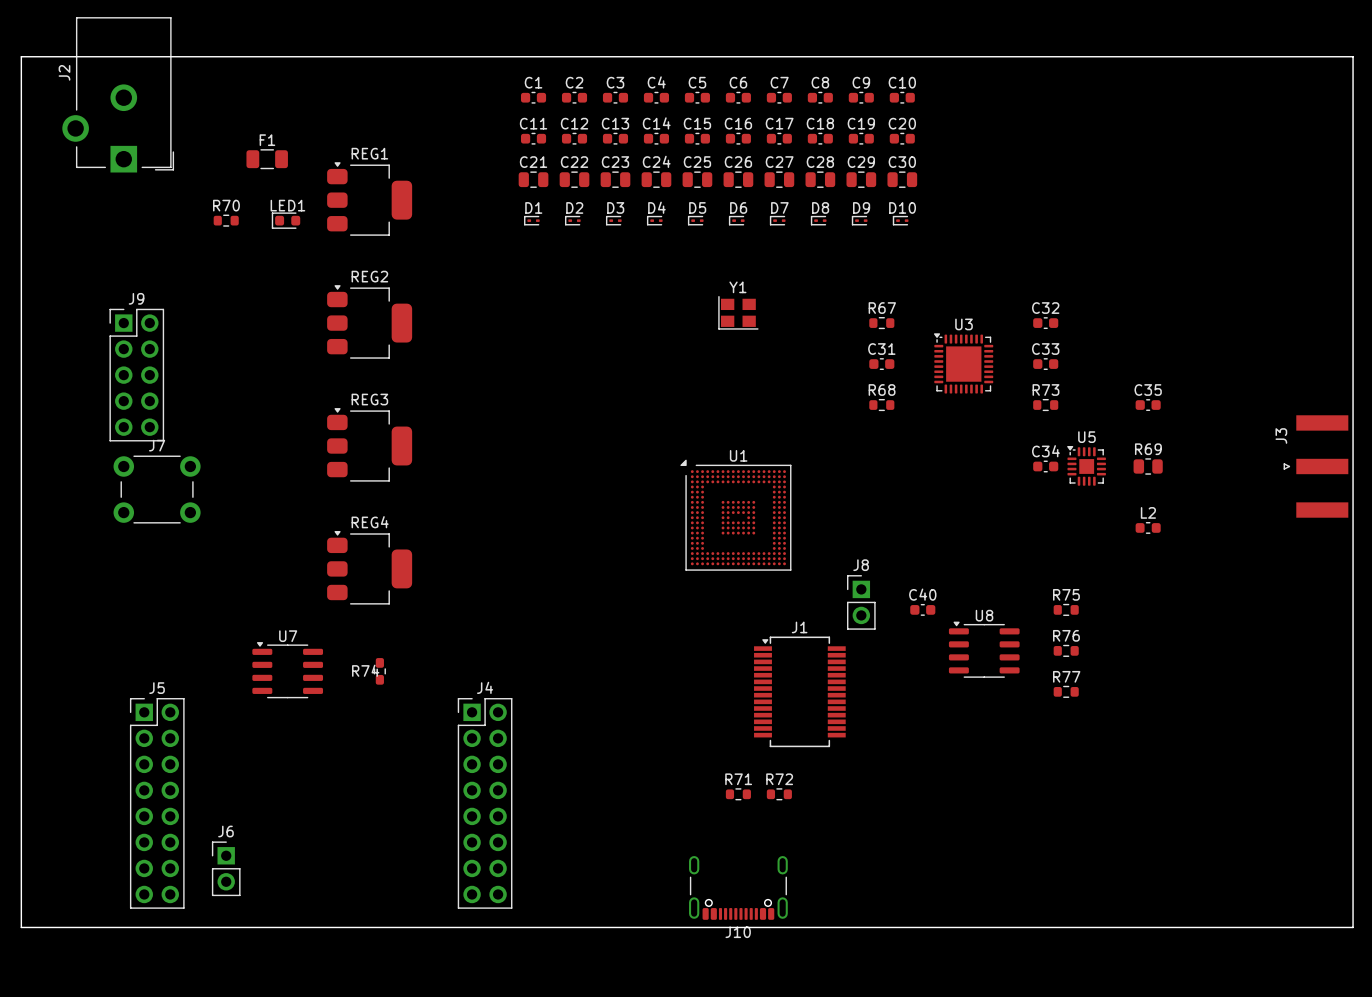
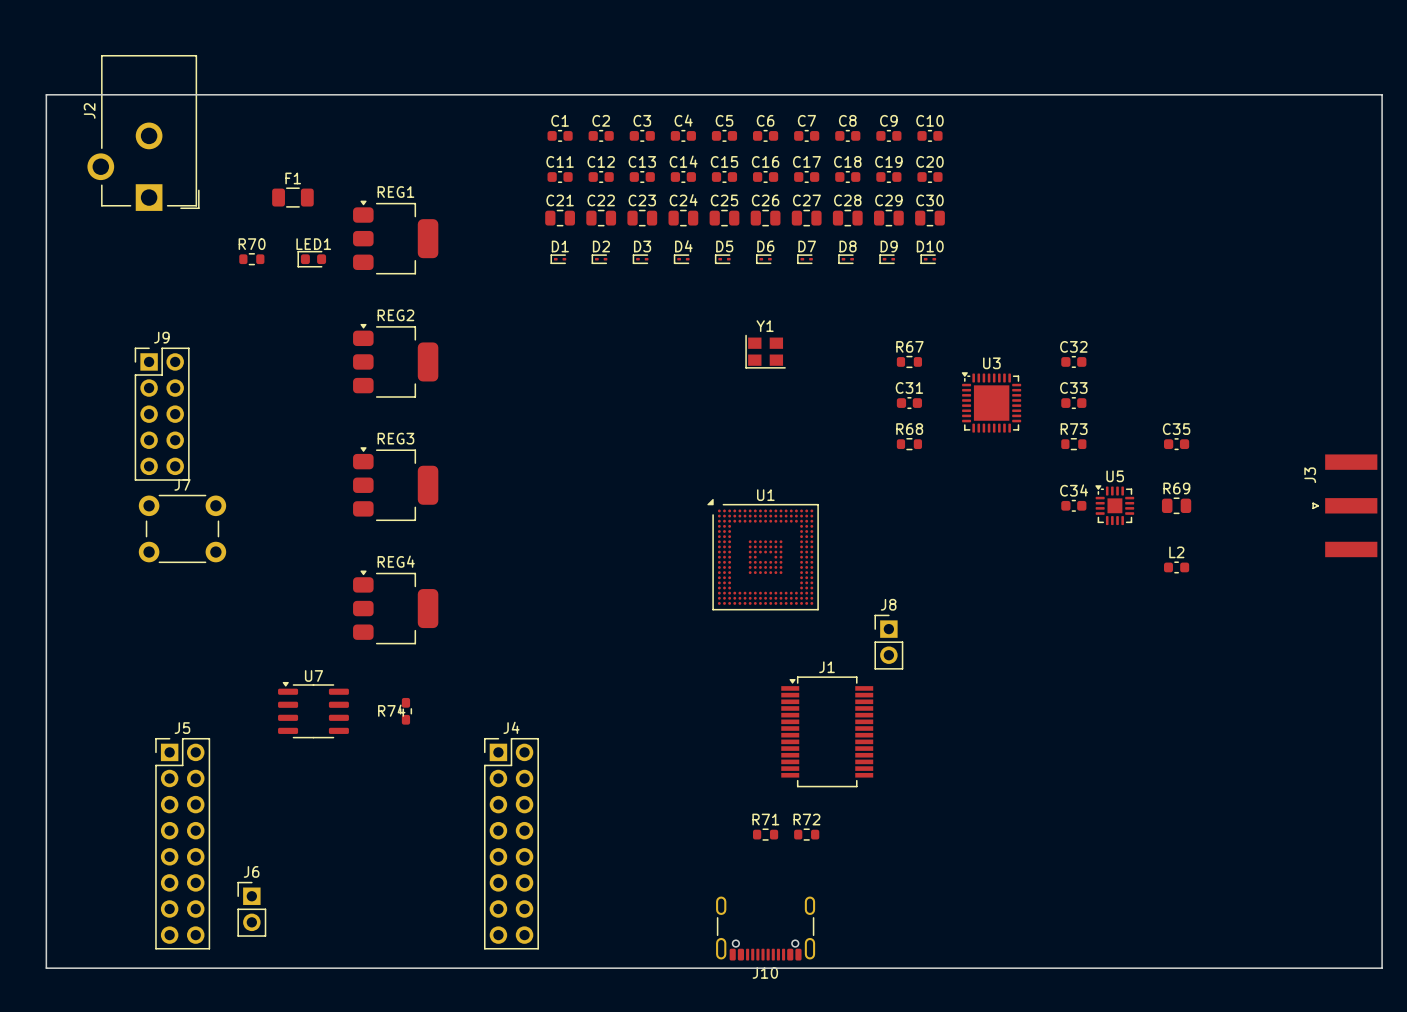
C40: (922, 609) -> none
R75: (1066, 609) -> none
U8: (984, 649) -> none
R76: (1066, 650) -> none
R77: (1066, 691) -> none

